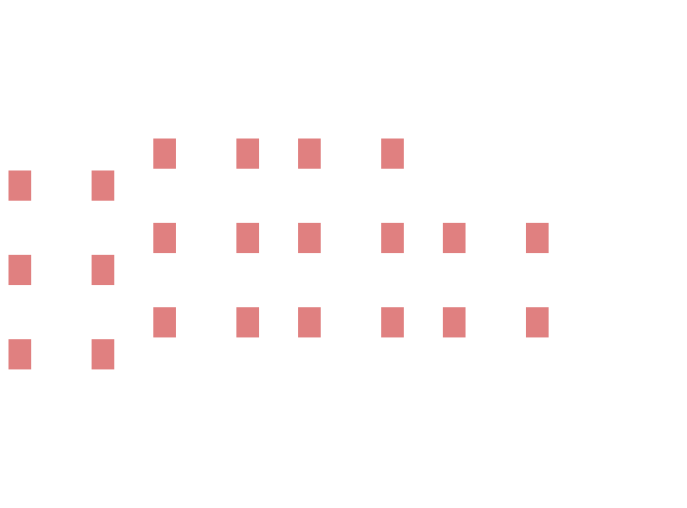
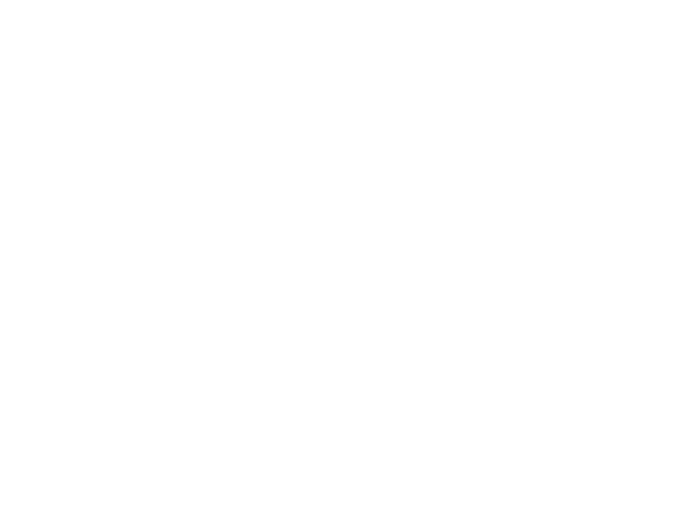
part: (206, 153) -> none
part: (350, 153) -> none
part: (61, 185) -> none
part: (206, 237) -> none
part: (350, 237) -> none
part: (495, 237) -> none
part: (61, 269) -> none
part: (206, 322) -> none
part: (350, 322) -> none
part: (495, 322) -> none
part: (61, 354) -> none

